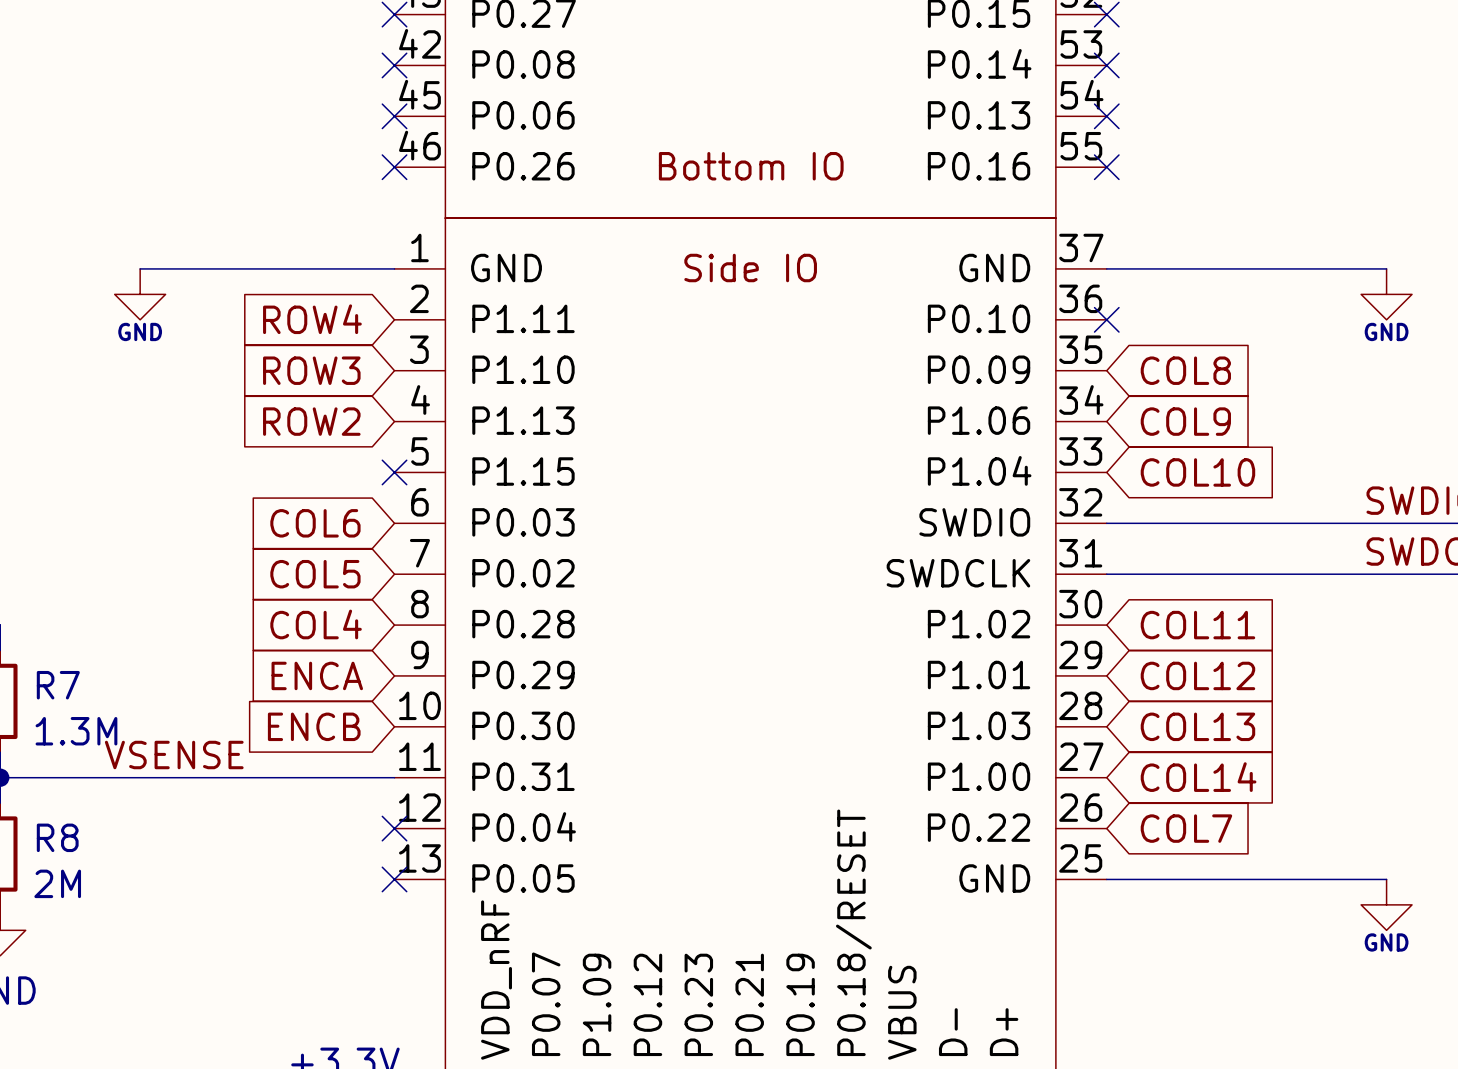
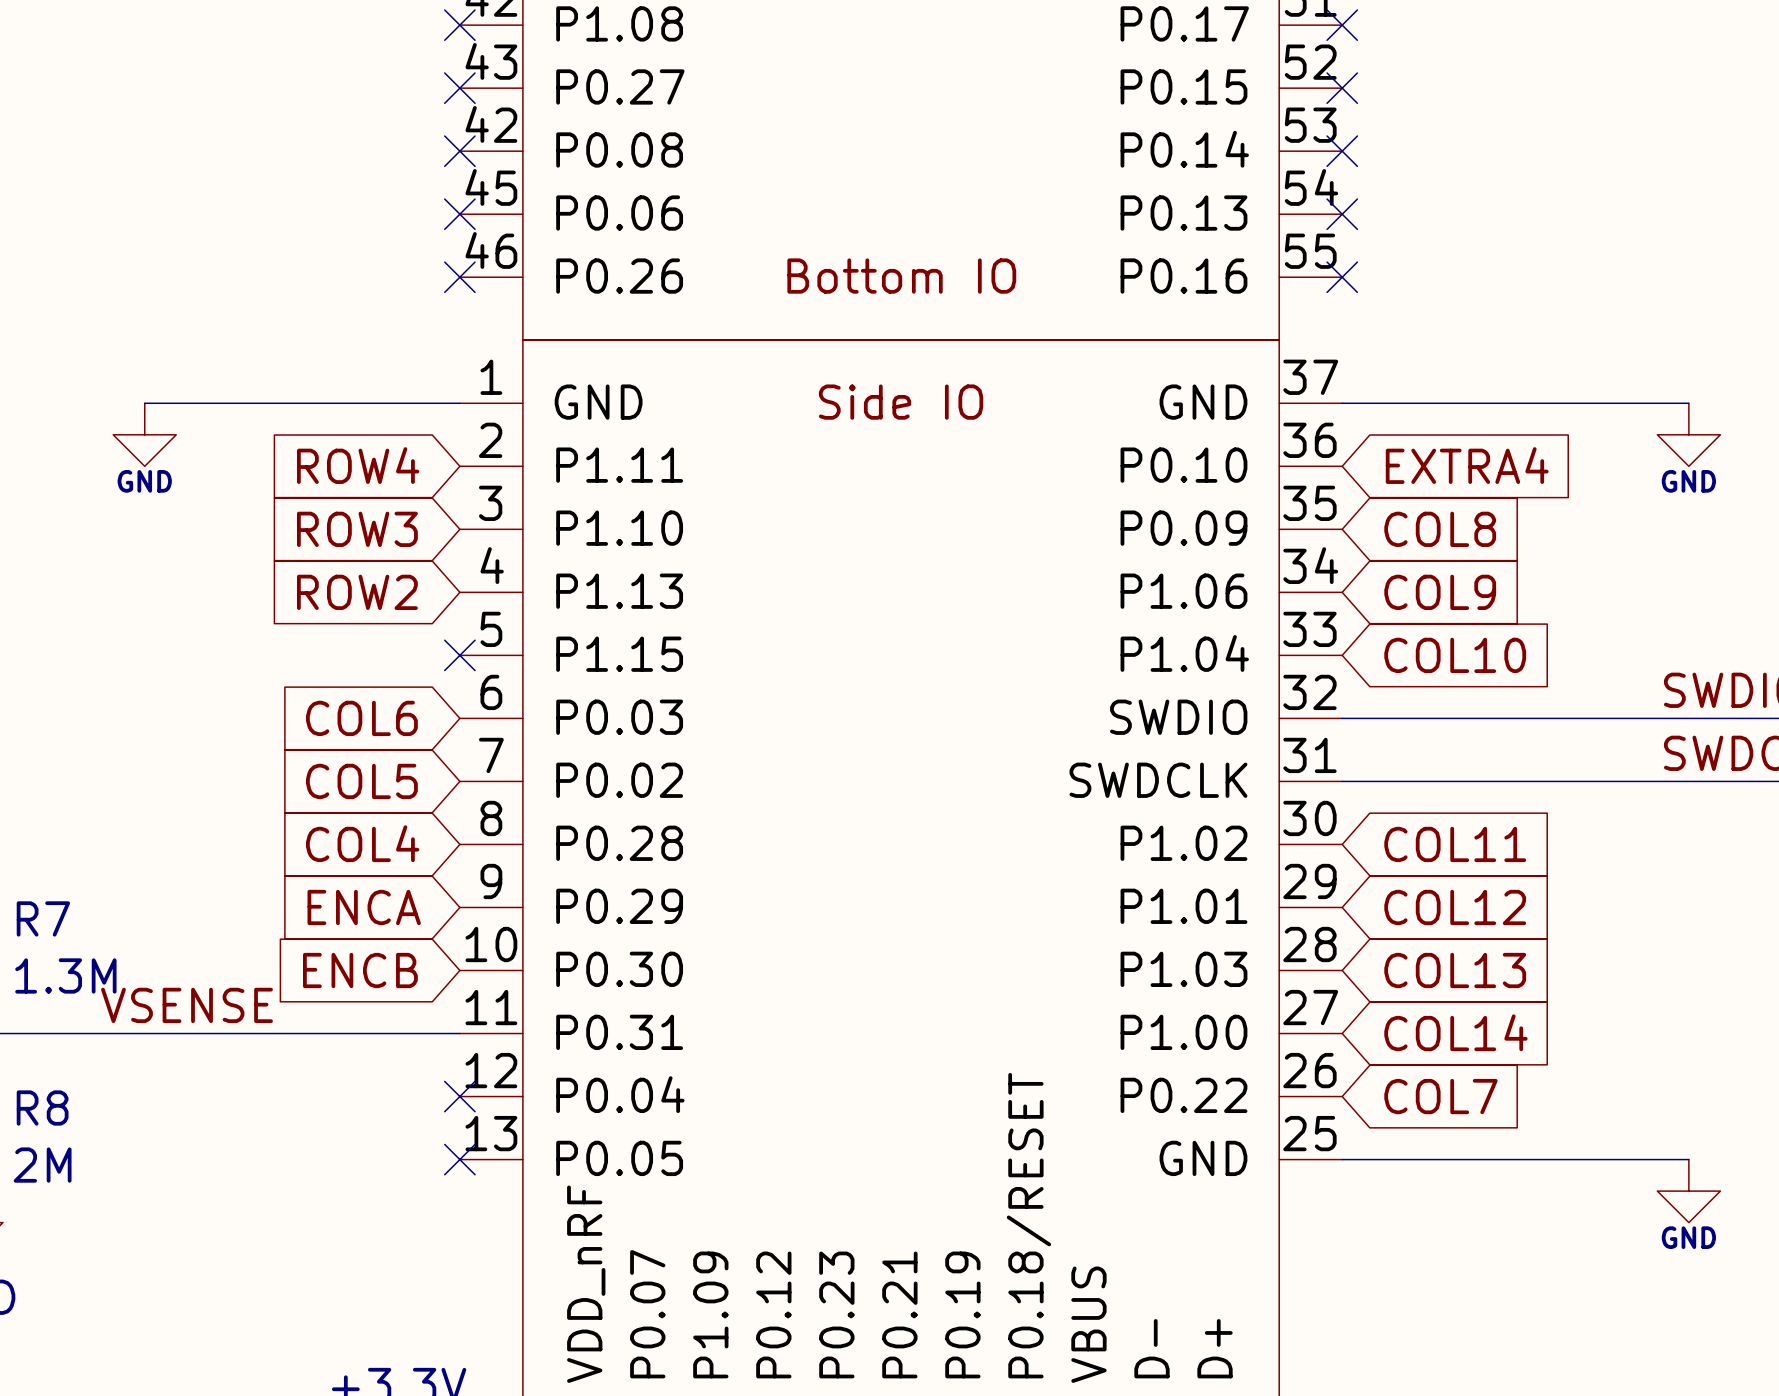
no-connect mark: (1106, 319) -> none
global label: none -> EXTRA4 (1467, 465)

